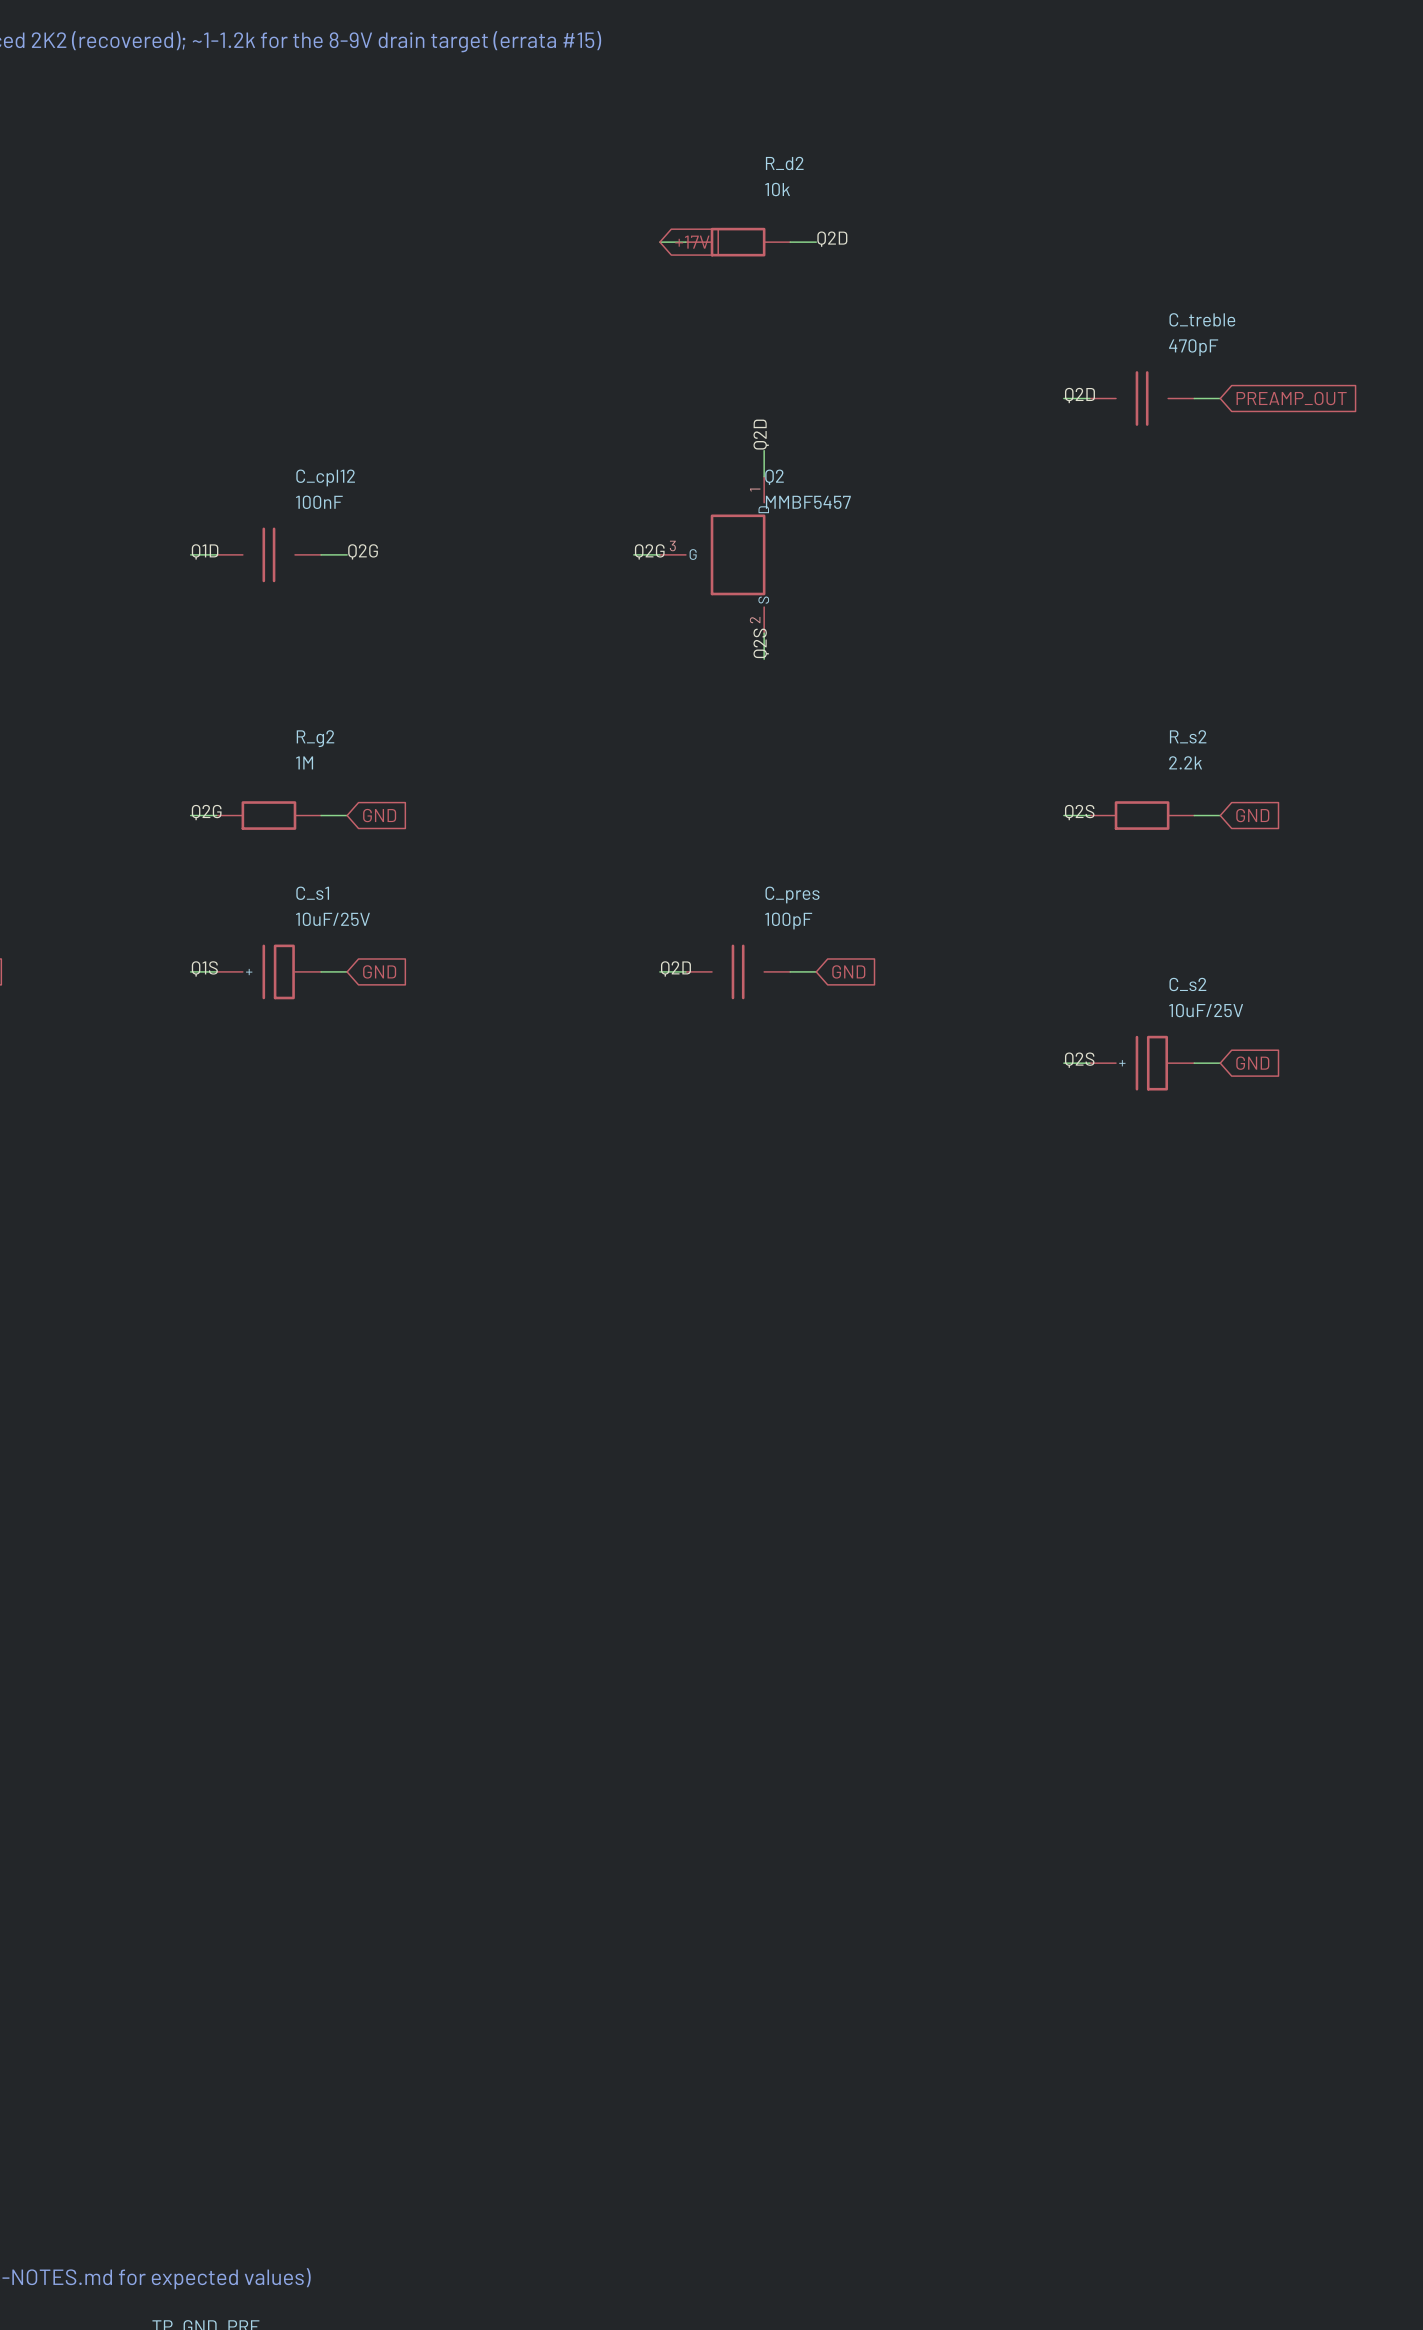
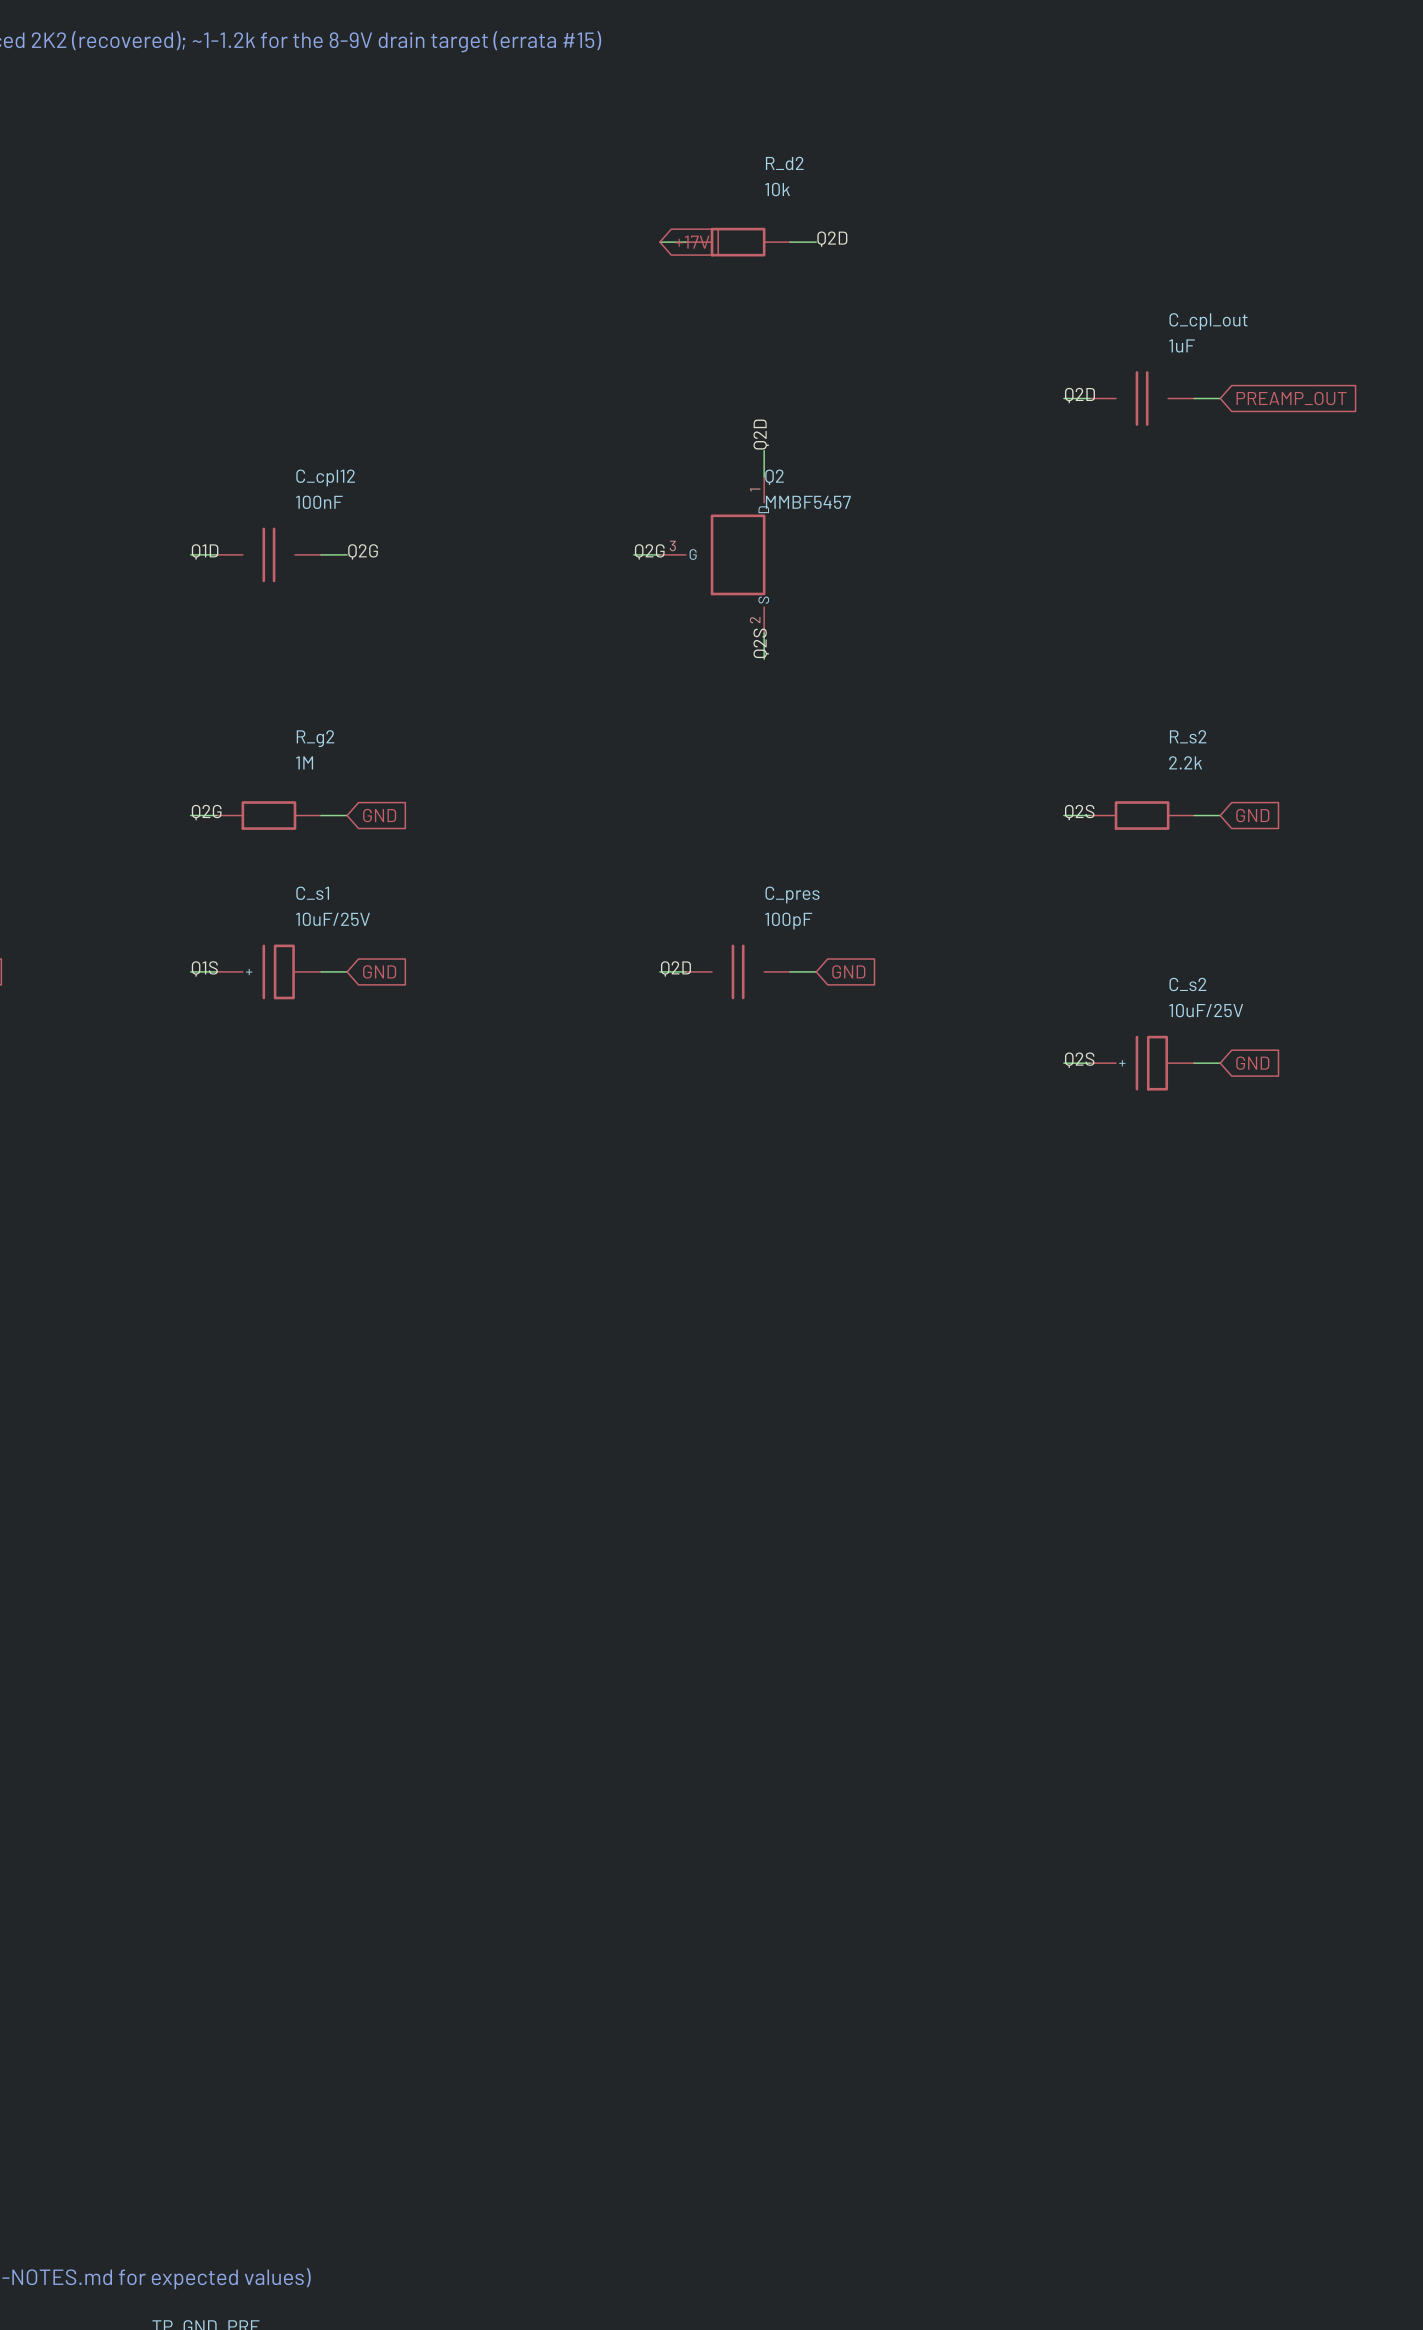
C_treble name: C_treble (1202, 319) -> C_cpl_out (1208, 321)
C_treble value: 470pF (1193, 347) -> 1uF (1182, 345)

